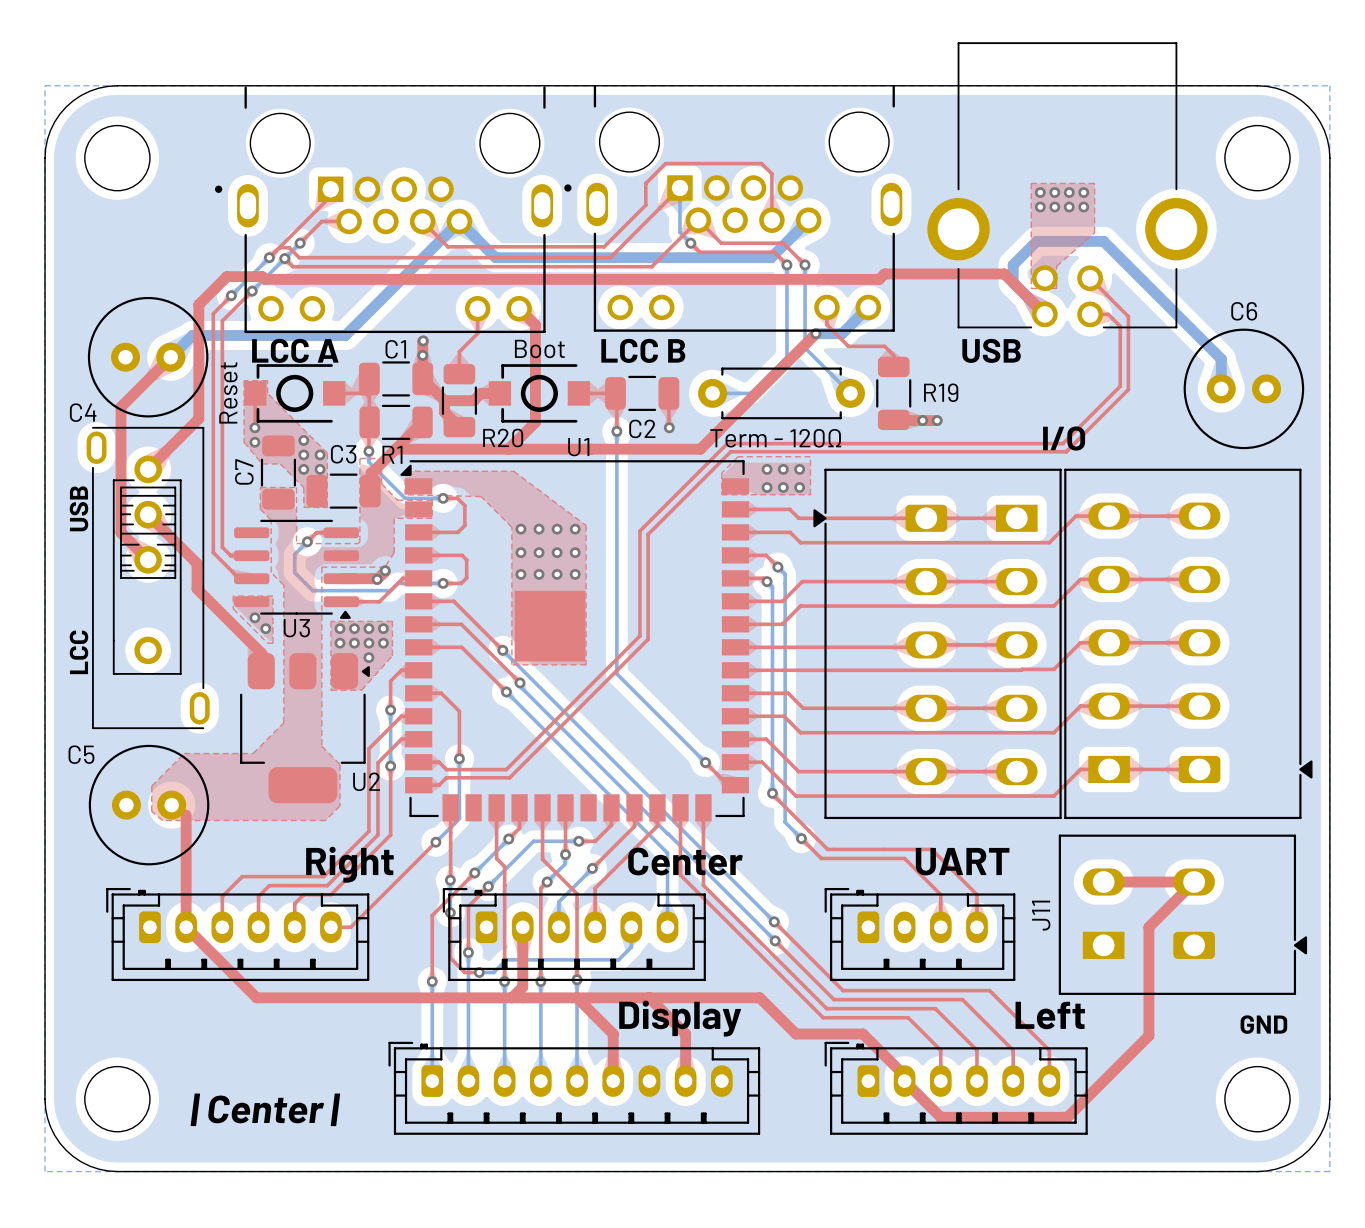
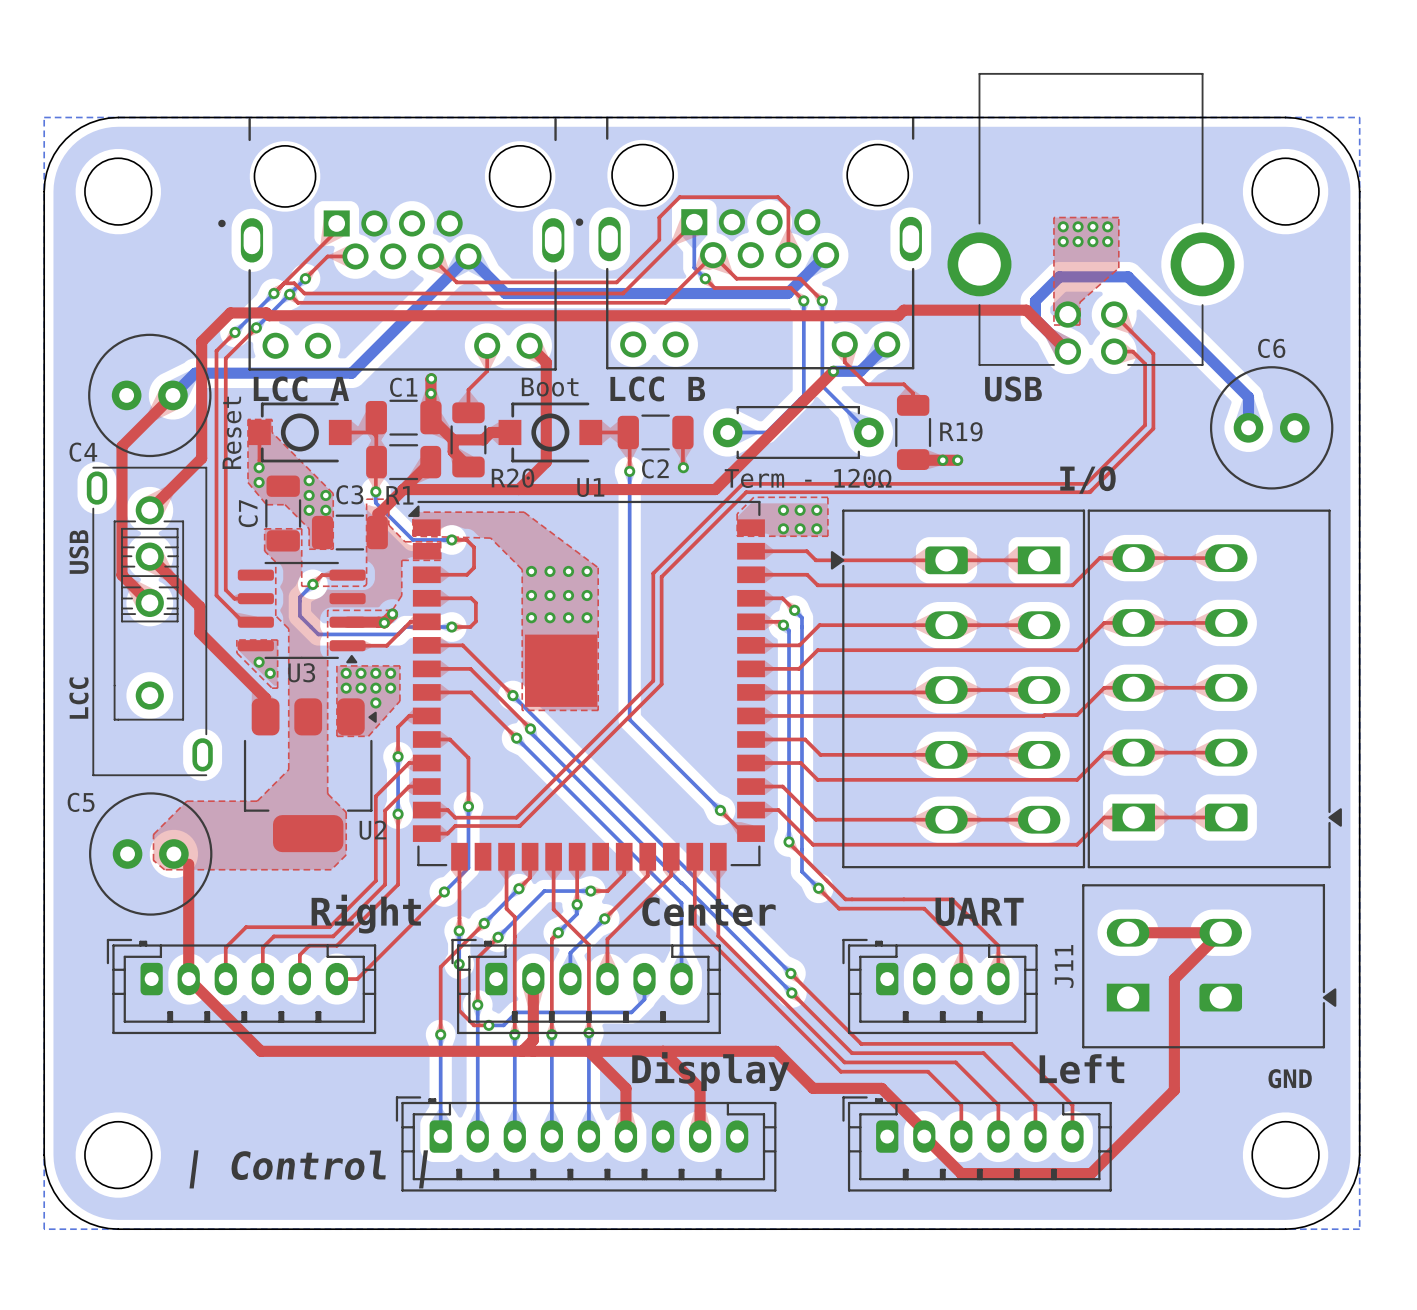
text: | Center | (265, 1109) -> | Control | (308, 1169)

